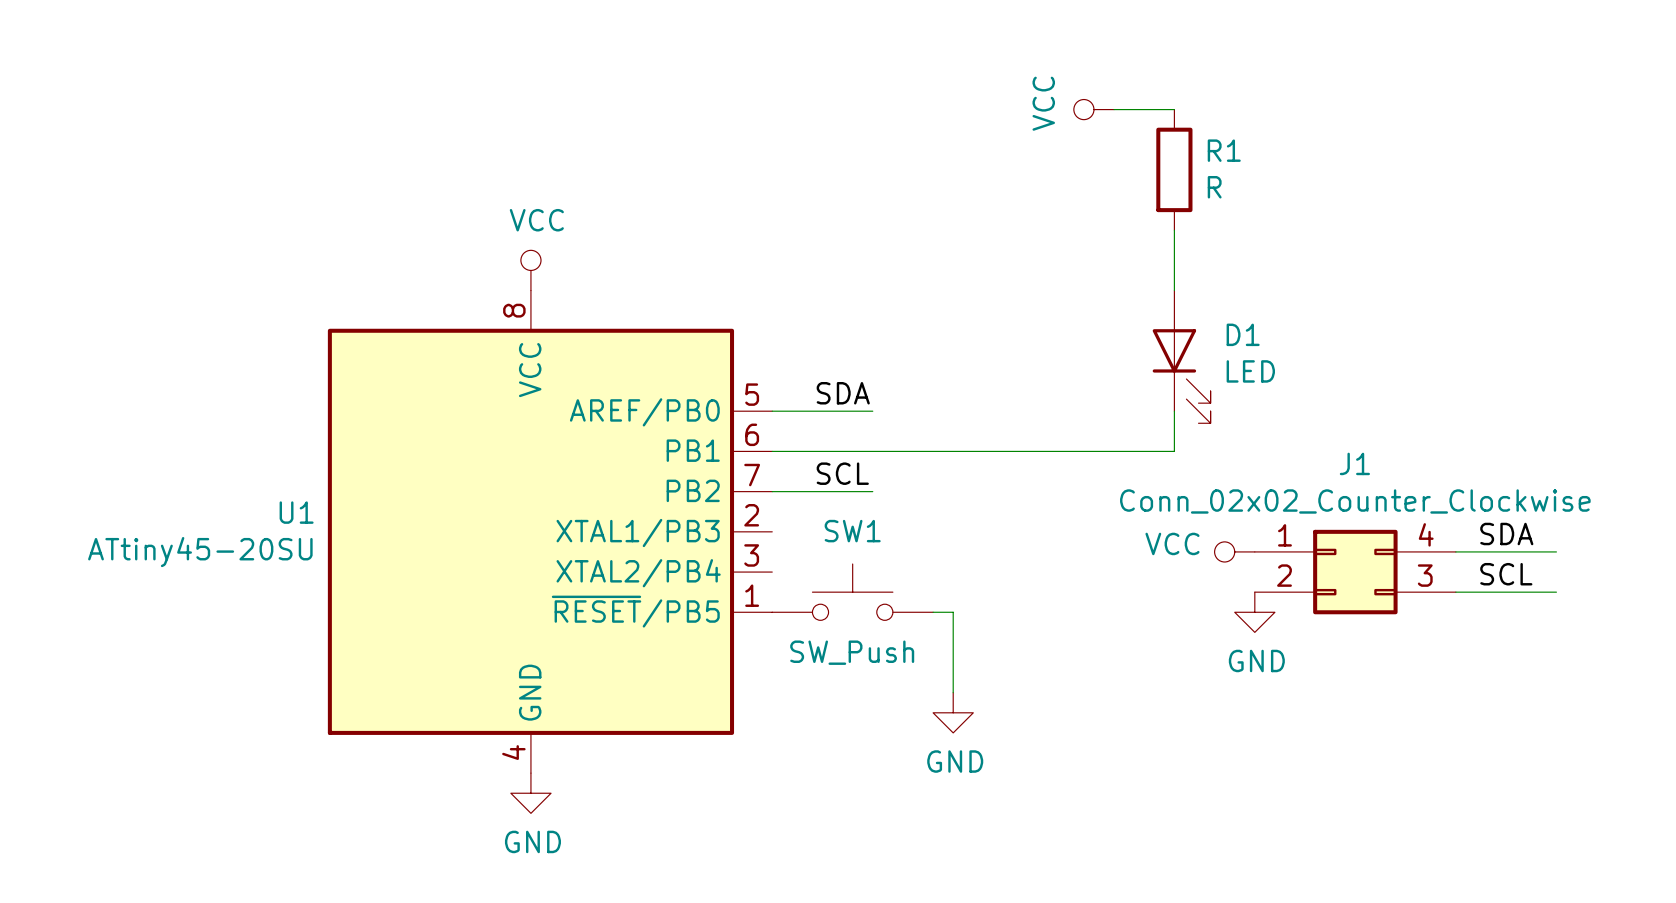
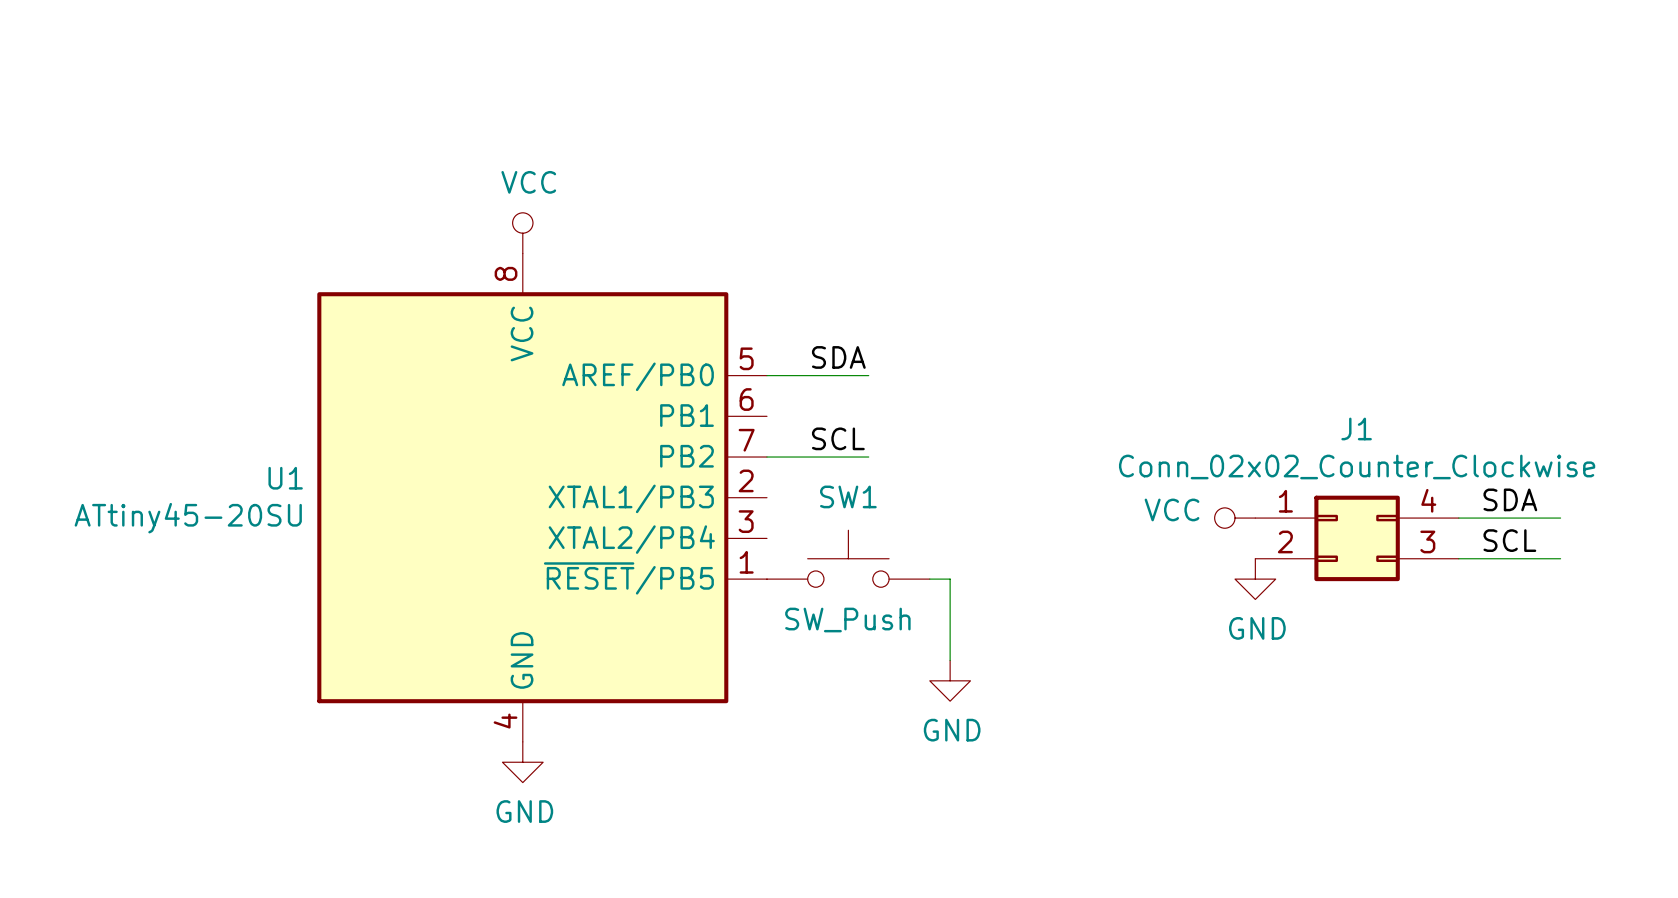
power symbol: VCC (1093, 109) -> none
wire: (1114, 109) (1174, 109) -> none
R1: R (1174, 169) -> none
wire: (1174, 230) (1174, 290) -> none
D1: LED (1181, 356) -> none
wire: (1174, 411) (1174, 451) (772, 451) -> none

